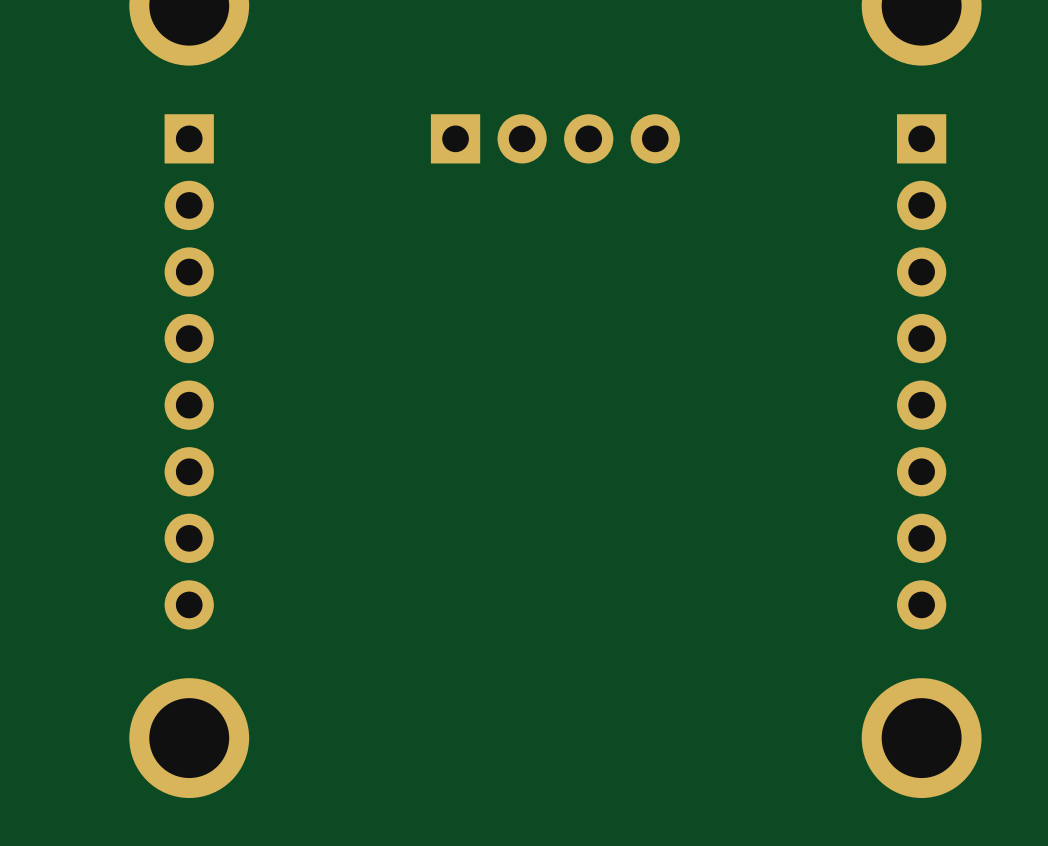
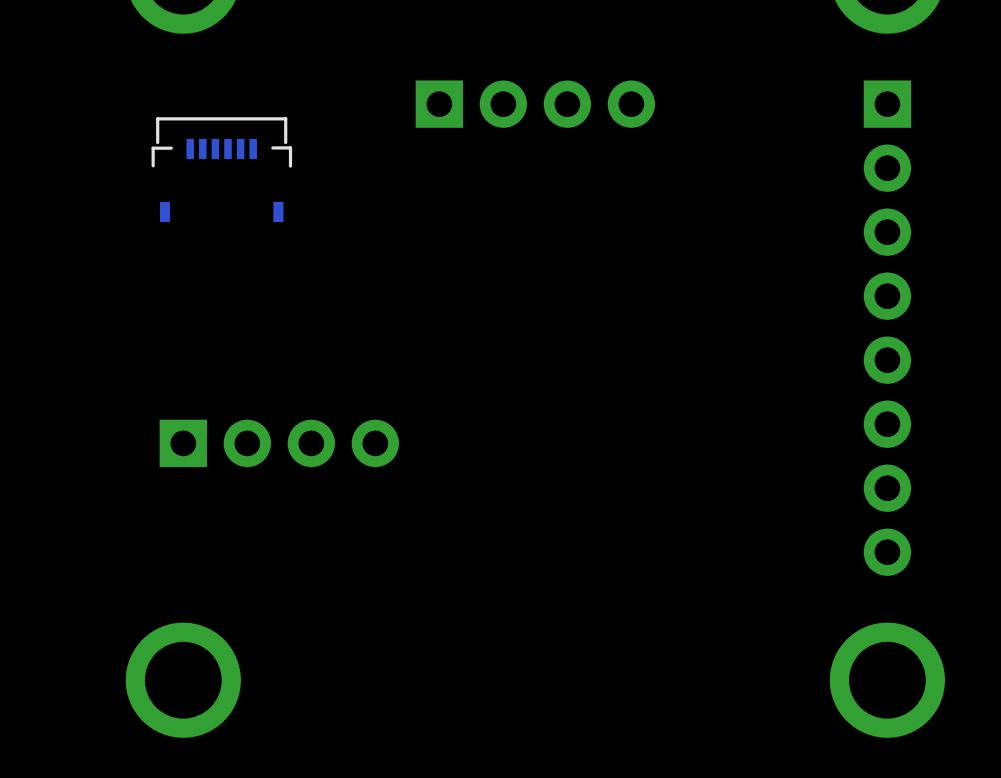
part: none -> (221, 169)
part: (189, 371) -> none
part: none -> (279, 443)

